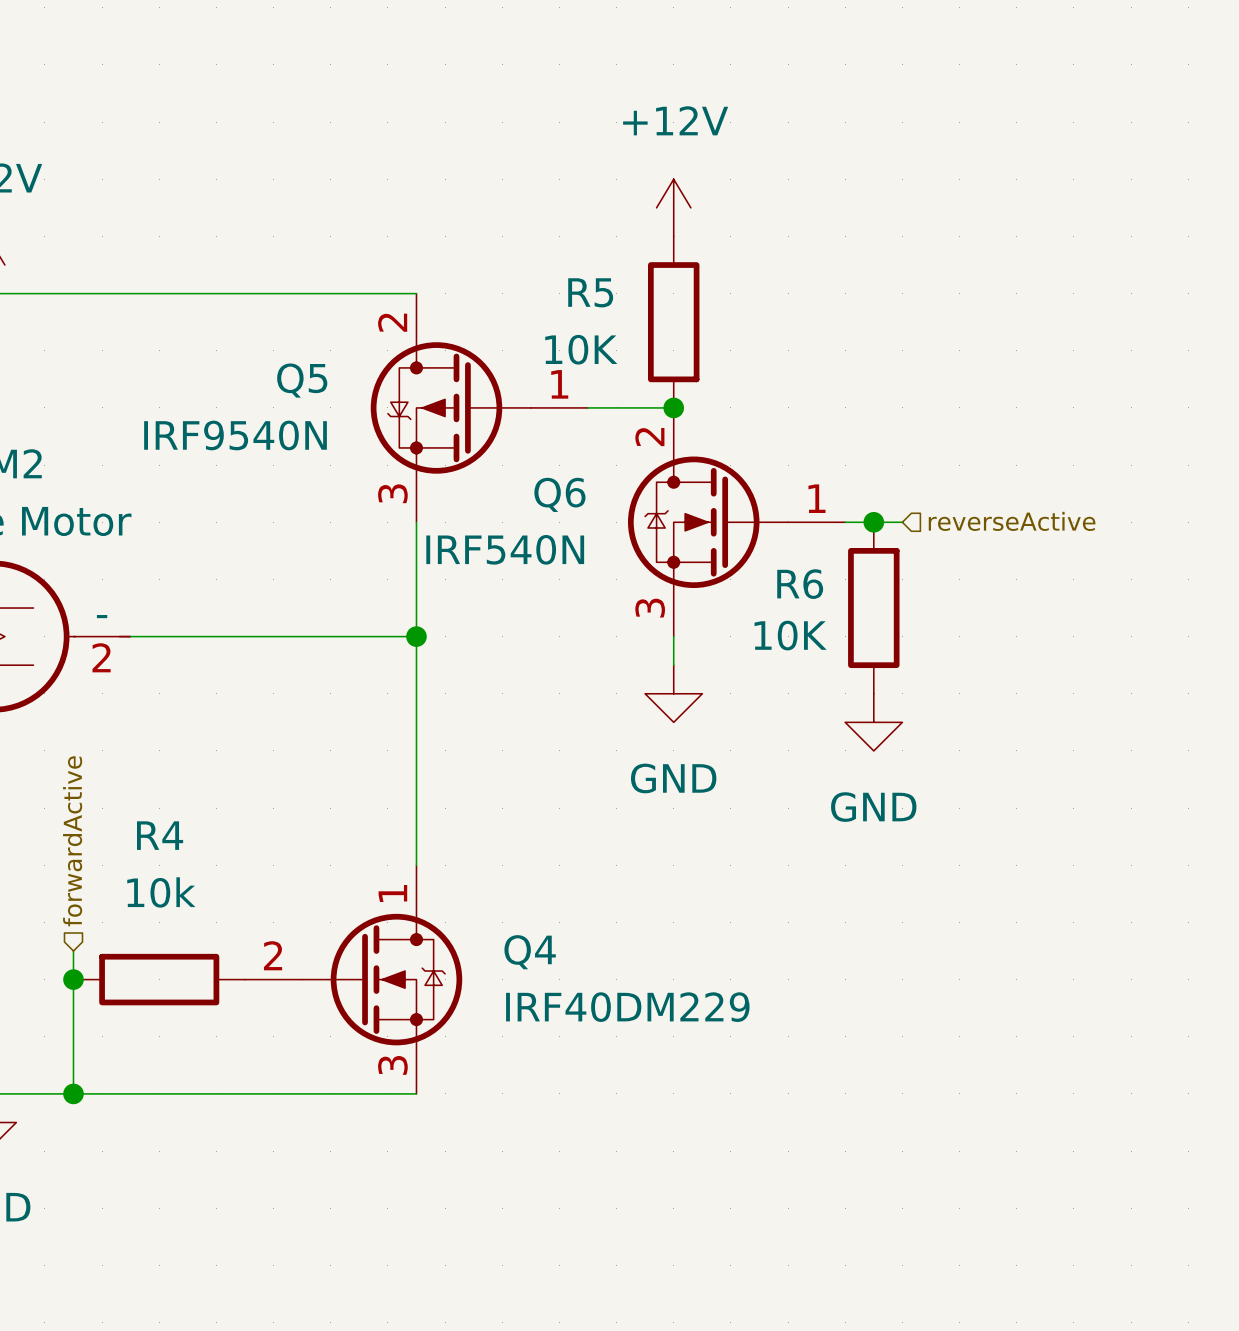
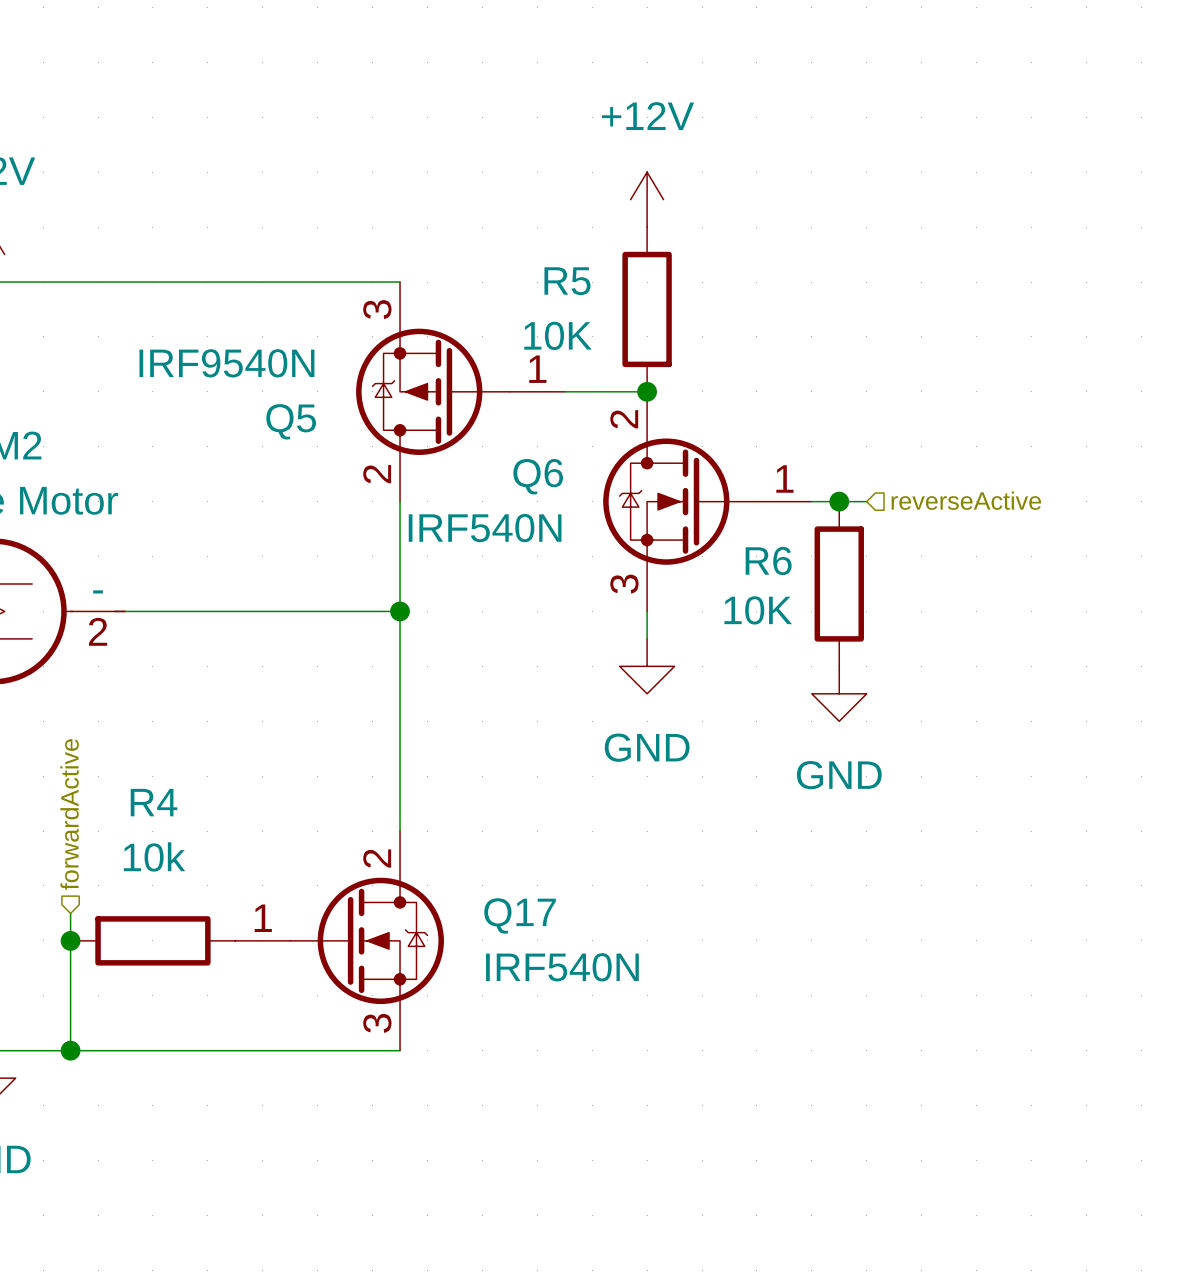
Q5 flip: as is (450, 407) -> up-down (432, 391)
Q4 pin number: 1 (392, 893) -> 2 (377, 858)
Q4 name: Q4 (530, 952) -> Q17 (520, 915)
Q4 pin number: 2 (273, 955) -> 1 (263, 918)
Q4 value: IRF40DM229 (627, 1007) -> IRF540N (562, 967)

